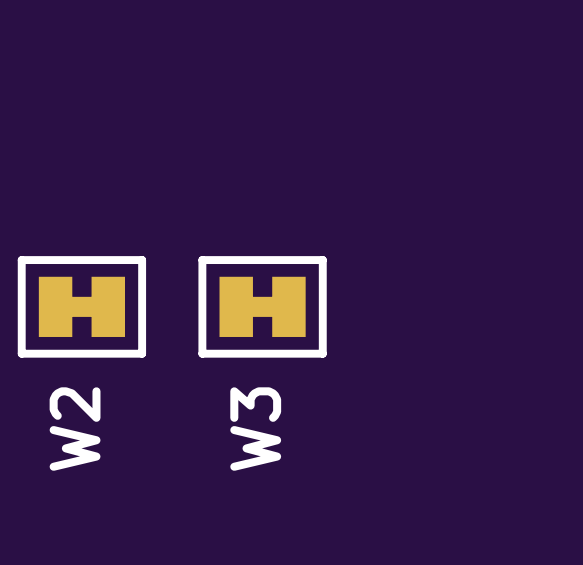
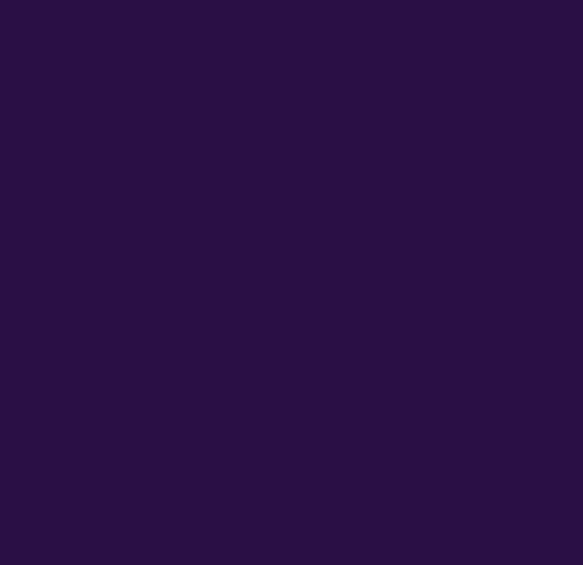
W2: (81, 306) -> none
W3: (262, 306) -> none

